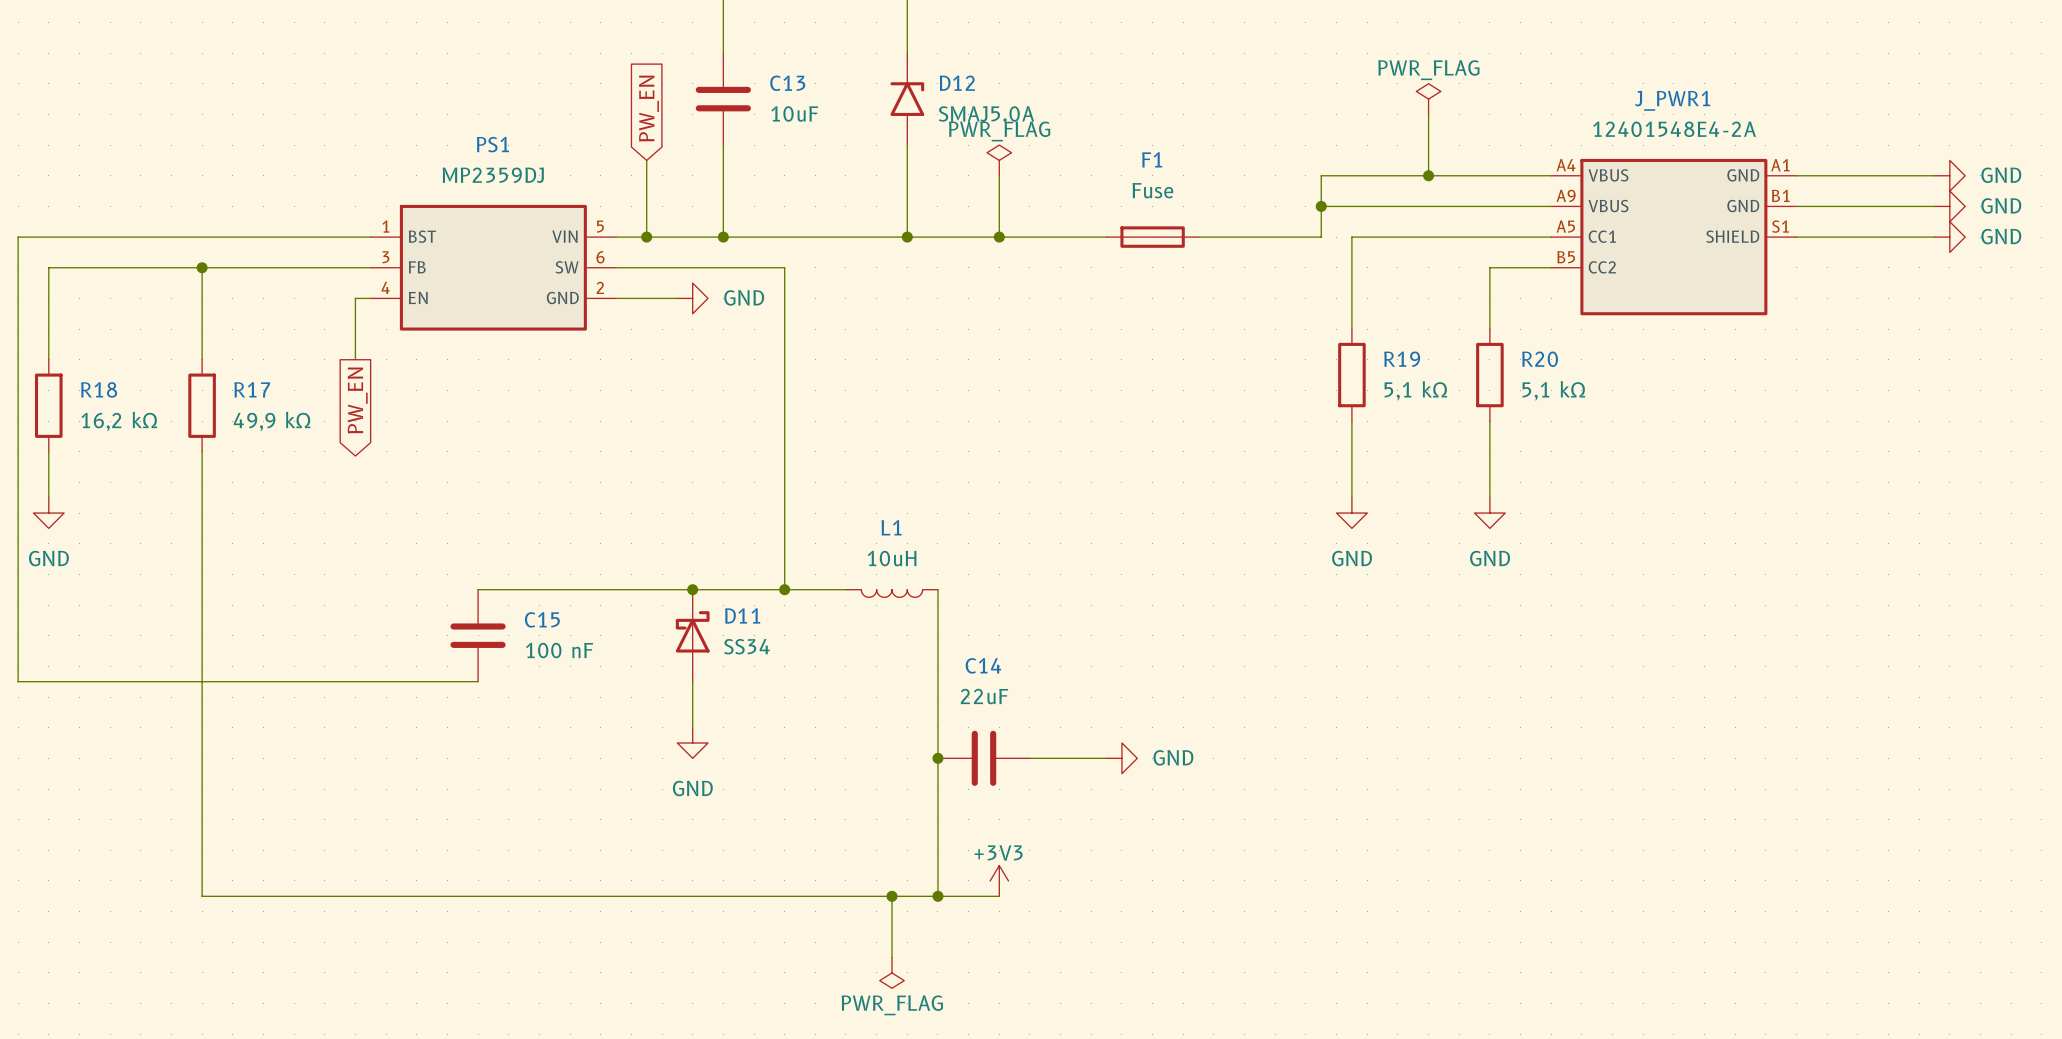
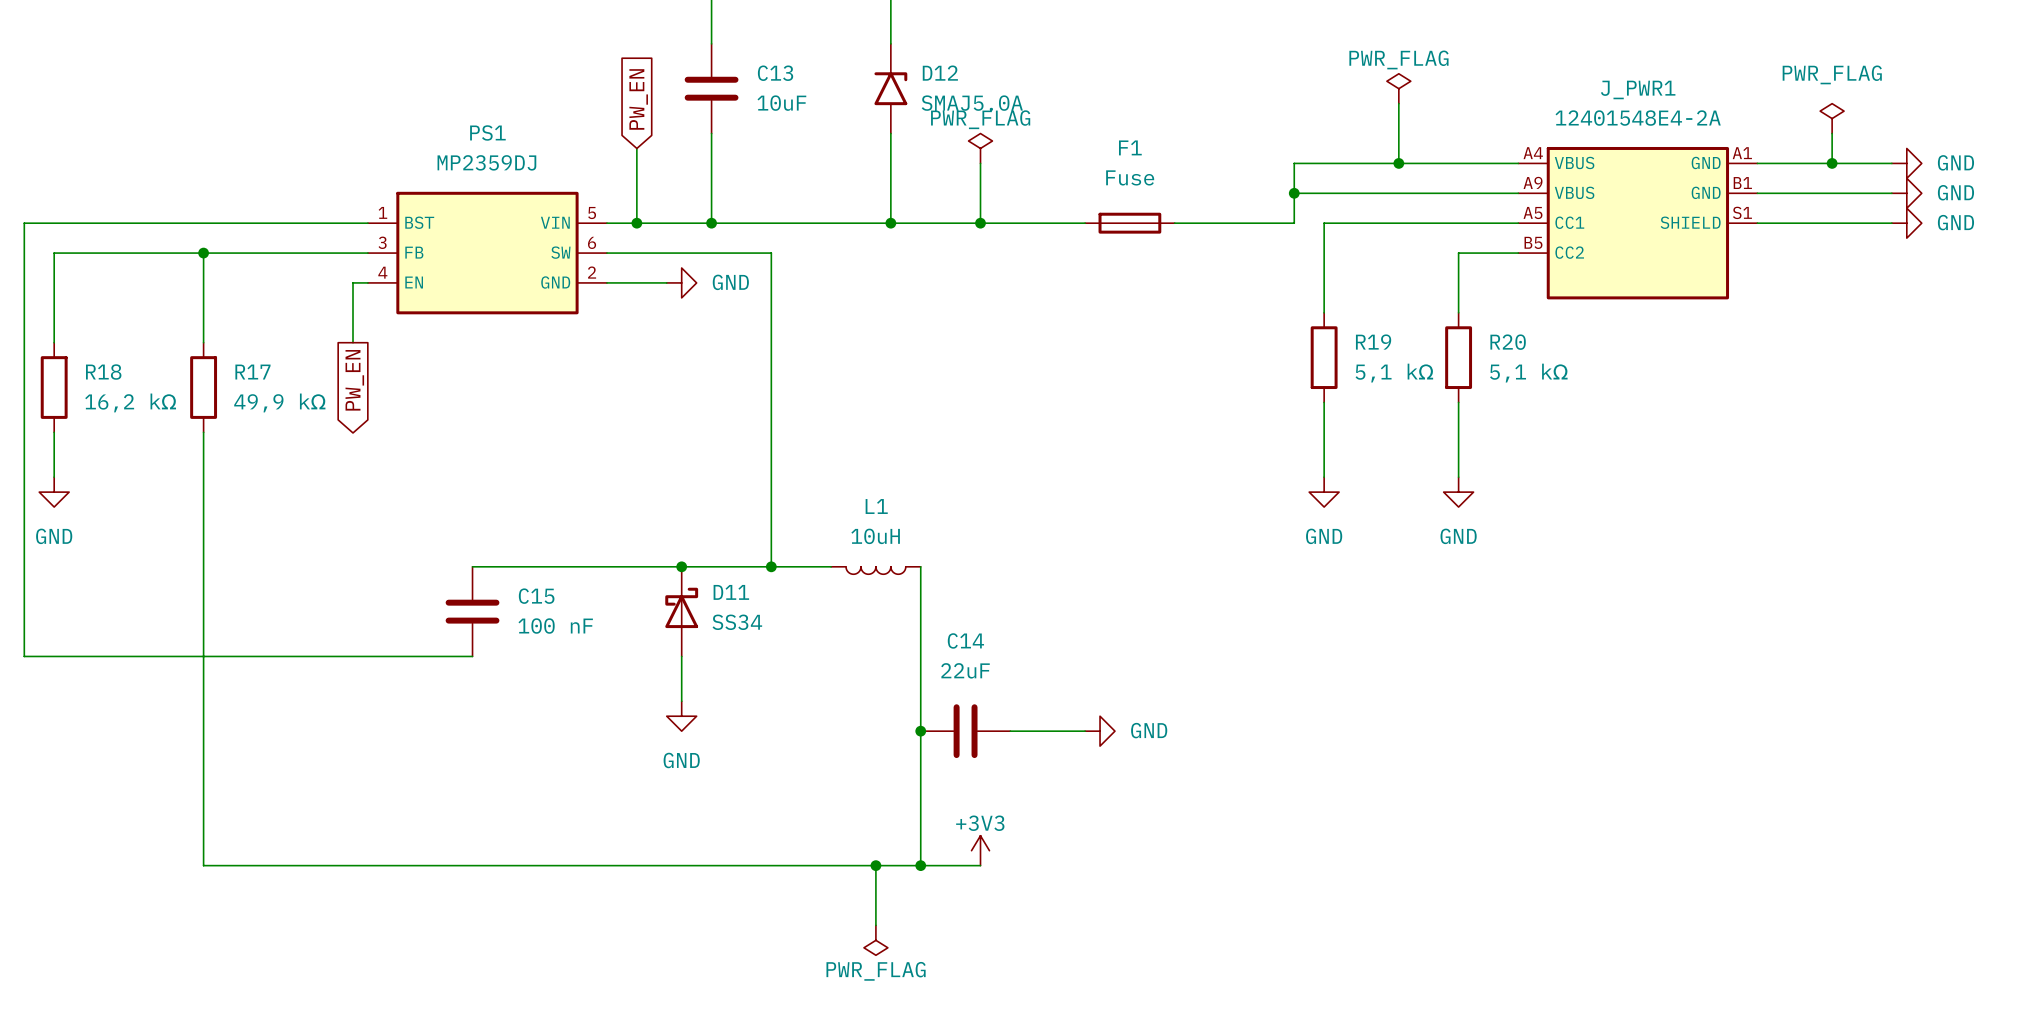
power symbol: none -> PWR_FLAG (1832, 118)
wire: none -> (1832, 133) (1832, 163)
junction: none -> (1832, 163)

